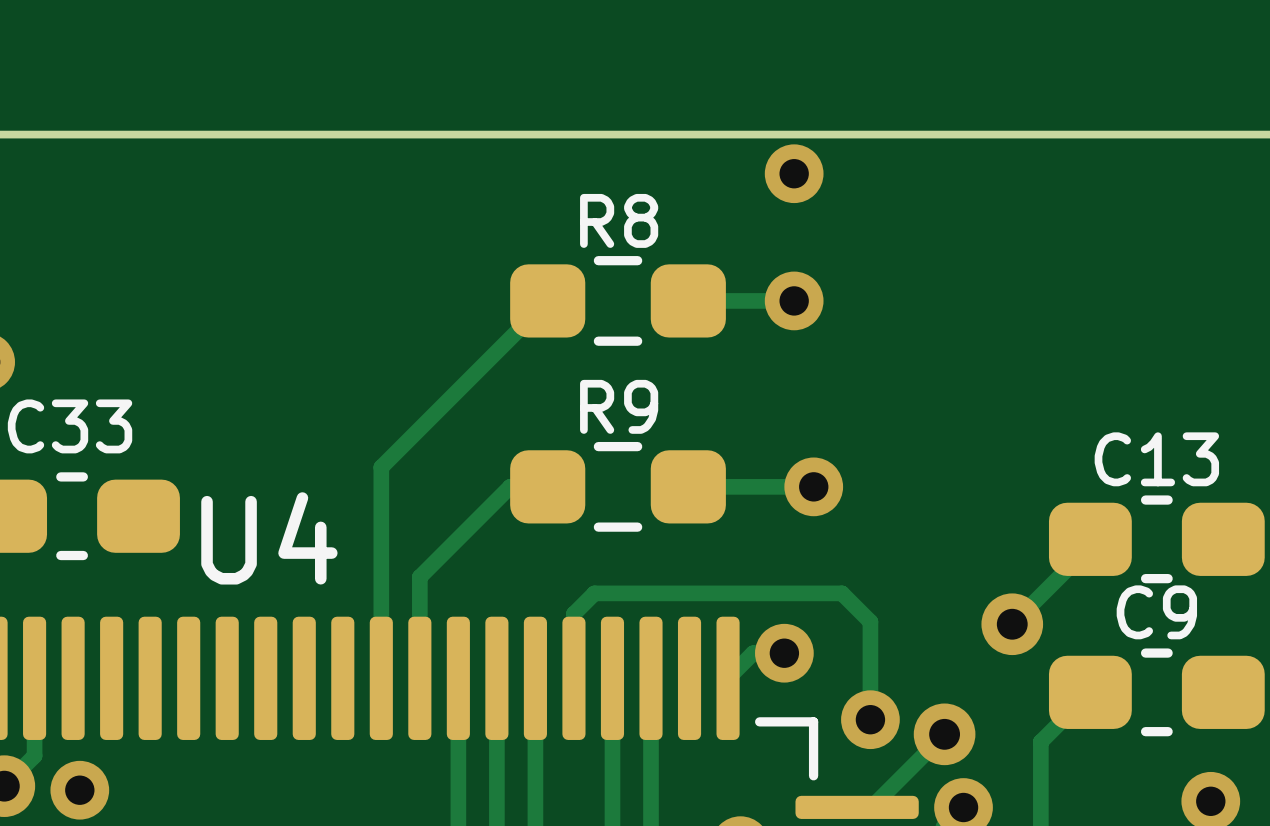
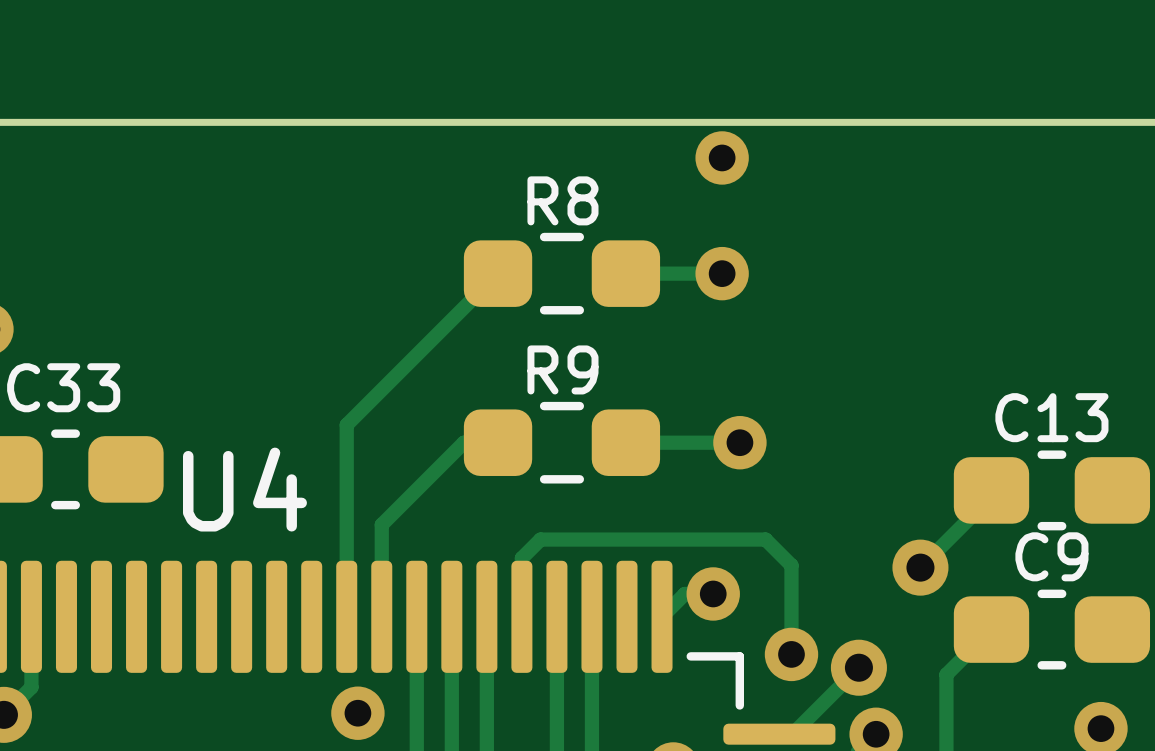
via position: (79, 790) -> (357, 713)

